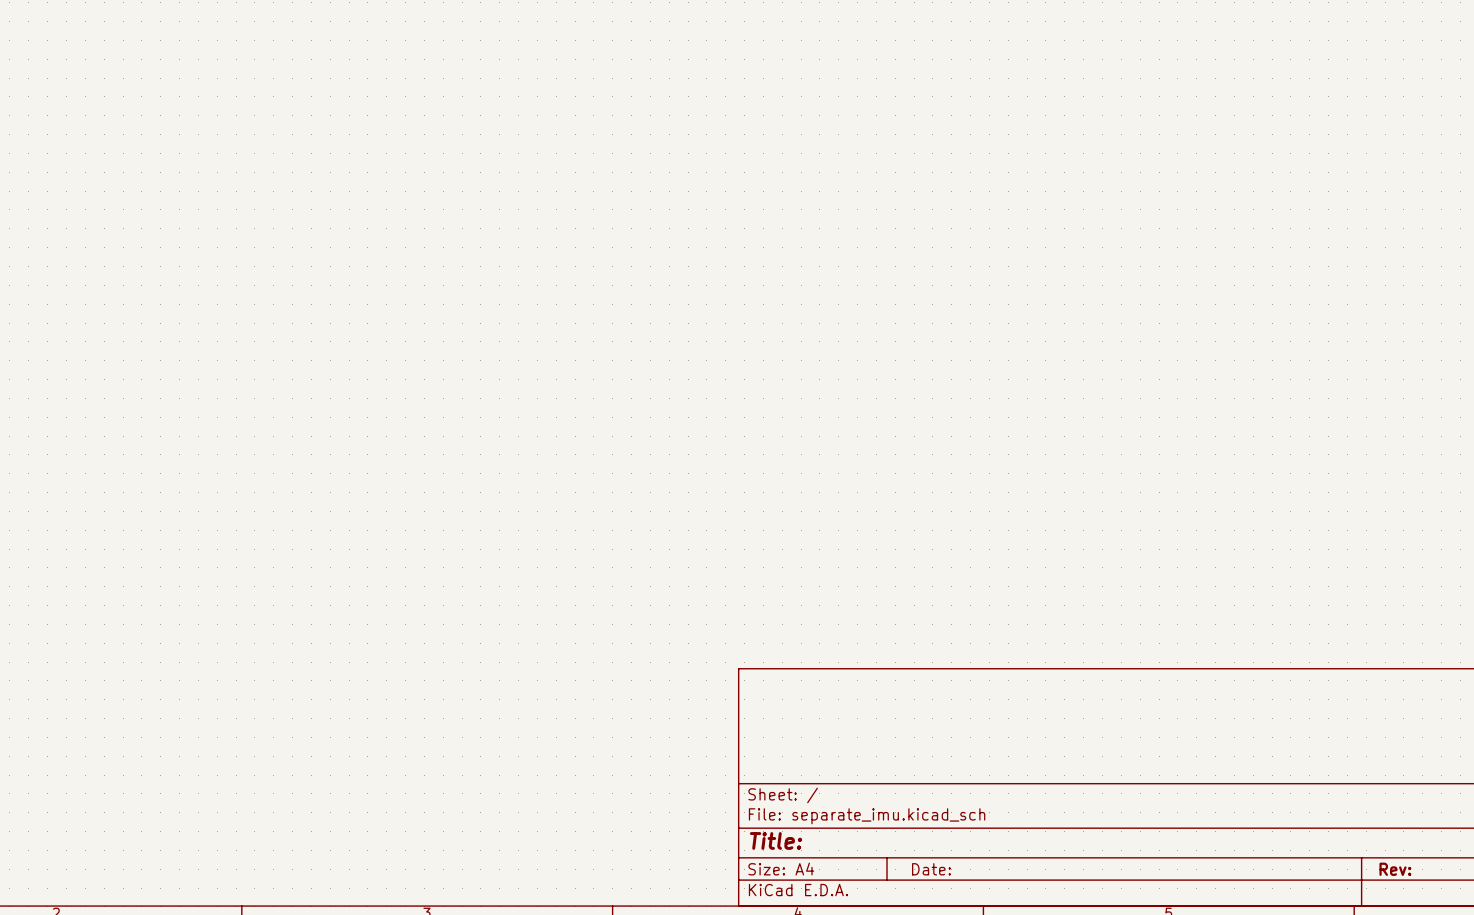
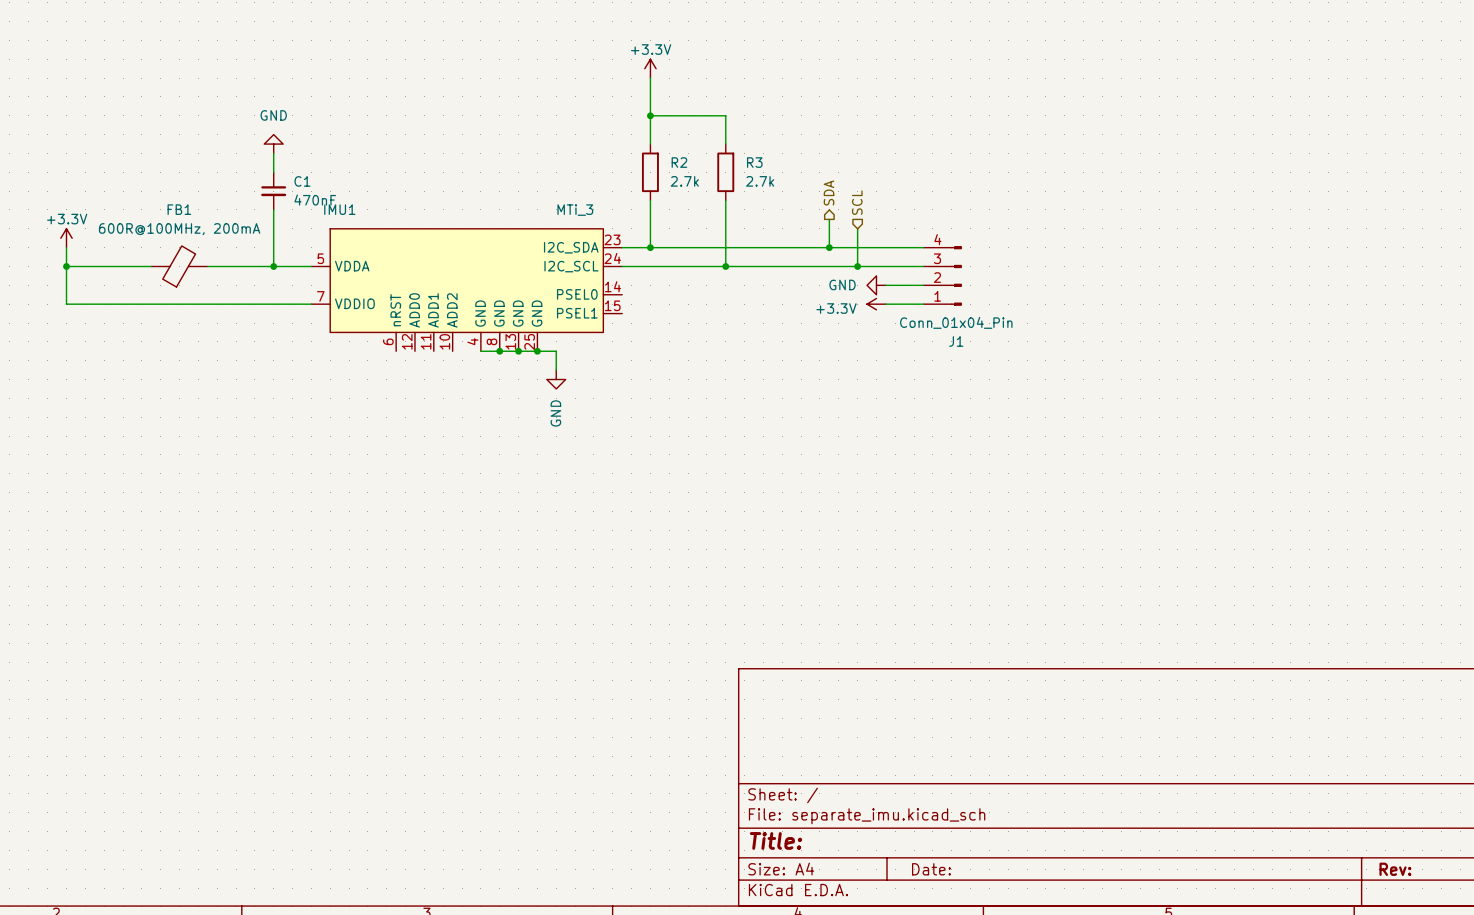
power symbol: none -> +3.3V (650, 68)
wire: none -> (650, 78) (650, 144)
wire: none -> (650, 115) (725, 115) (725, 144)
junction: none -> (650, 115)
power symbol: none -> GND (273, 144)
wire: none -> (273, 153) (273, 172)
R2: none -> 2.7k (650, 172)
R3: none -> 2.7k (725, 172)
C1: none -> 470nF (273, 191)
hierarchical label: none -> SDA (829, 193)
wire: none -> (650, 200) (650, 247)
wire: none -> (725, 200) (725, 266)
hierarchical label: none -> SCL (857, 202)
wire: none -> (273, 209) (273, 266)
wire: none -> (829, 219) (829, 247)
wire: none -> (857, 228) (857, 266)
power symbol: none -> +3.3V (66, 238)
wire: none -> (66, 247) (66, 304) (311, 304)
wire: none -> (622, 247) (923, 247)
junction: none -> (650, 247)
junction: none -> (829, 247)
wire: none -> (66, 266) (151, 266)
junction: none -> (66, 266)
FB1: none -> 600R@100MHz, 200mA (179, 266)
wire: none -> (207, 266) (311, 266)
junction: none -> (273, 266)
wire: none -> (622, 266) (923, 266)
junction: none -> (725, 266)
junction: none -> (857, 266)
J1: none -> Conn_01x04_Pin (942, 275)
power symbol: none -> GND (876, 285)
wire: none -> (885, 285) (923, 285)
IMU1: none -> MTi_3 (466, 290)
power symbol: none -> +3.3V (876, 304)
wire: none -> (885, 304) (923, 304)
wire: none -> (480, 351) (556, 351) (556, 370)
junction: none -> (499, 351)
junction: none -> (518, 351)
junction: none -> (537, 351)
power symbol: none -> GND (556, 379)

